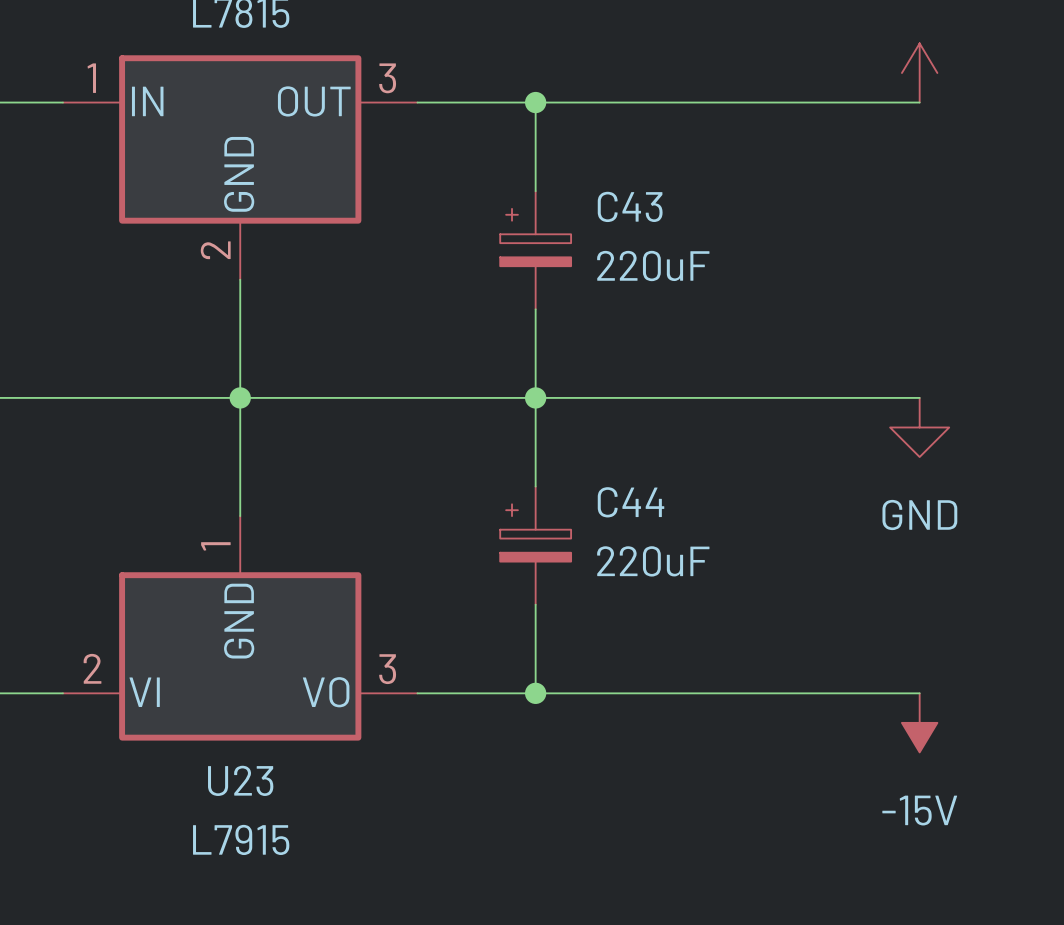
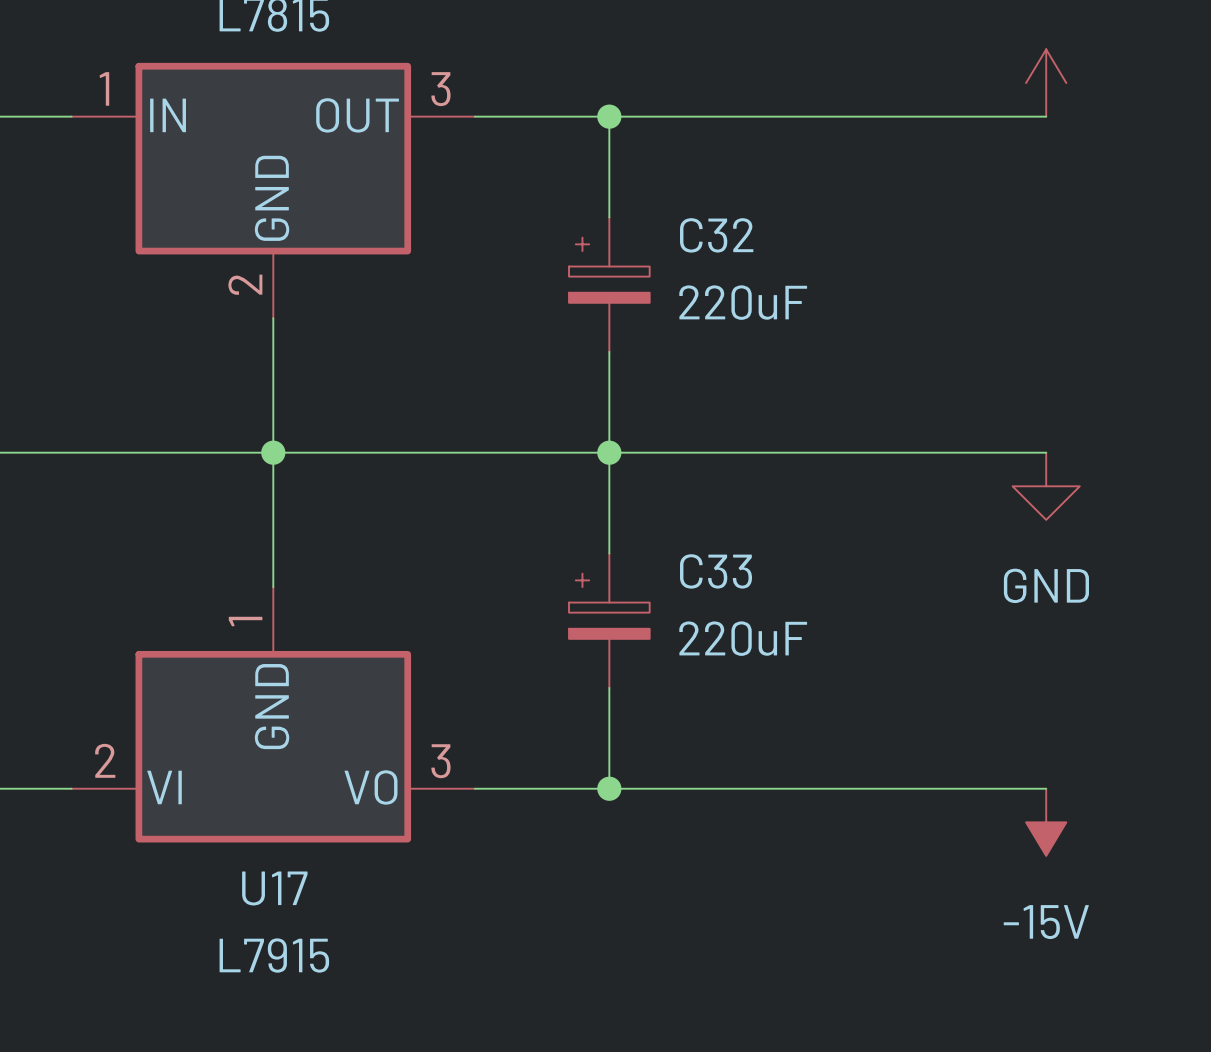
C43 name: C43 (630, 206) -> C32 (716, 235)
C44 name: C44 (631, 502) -> C33 (716, 571)
U23 name: U23 (240, 780) -> U17 (274, 888)

